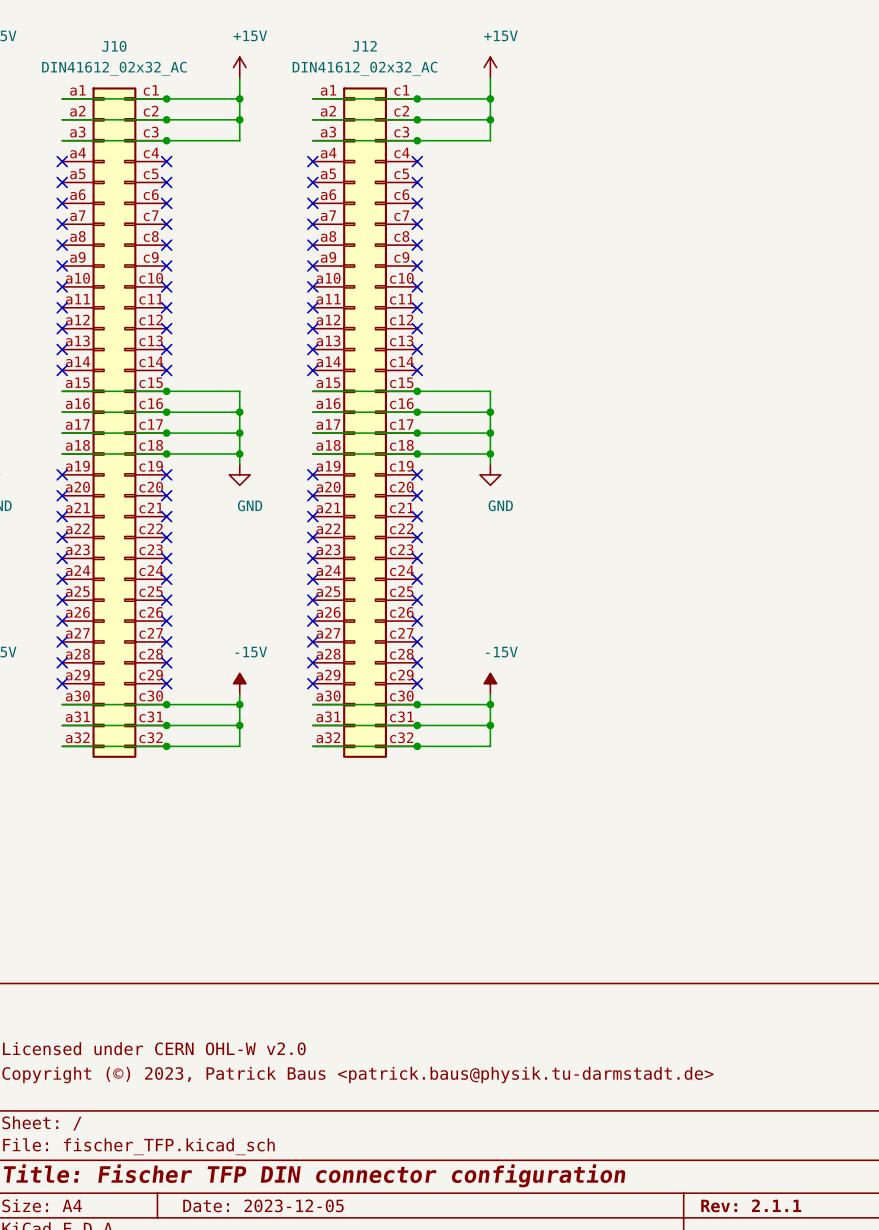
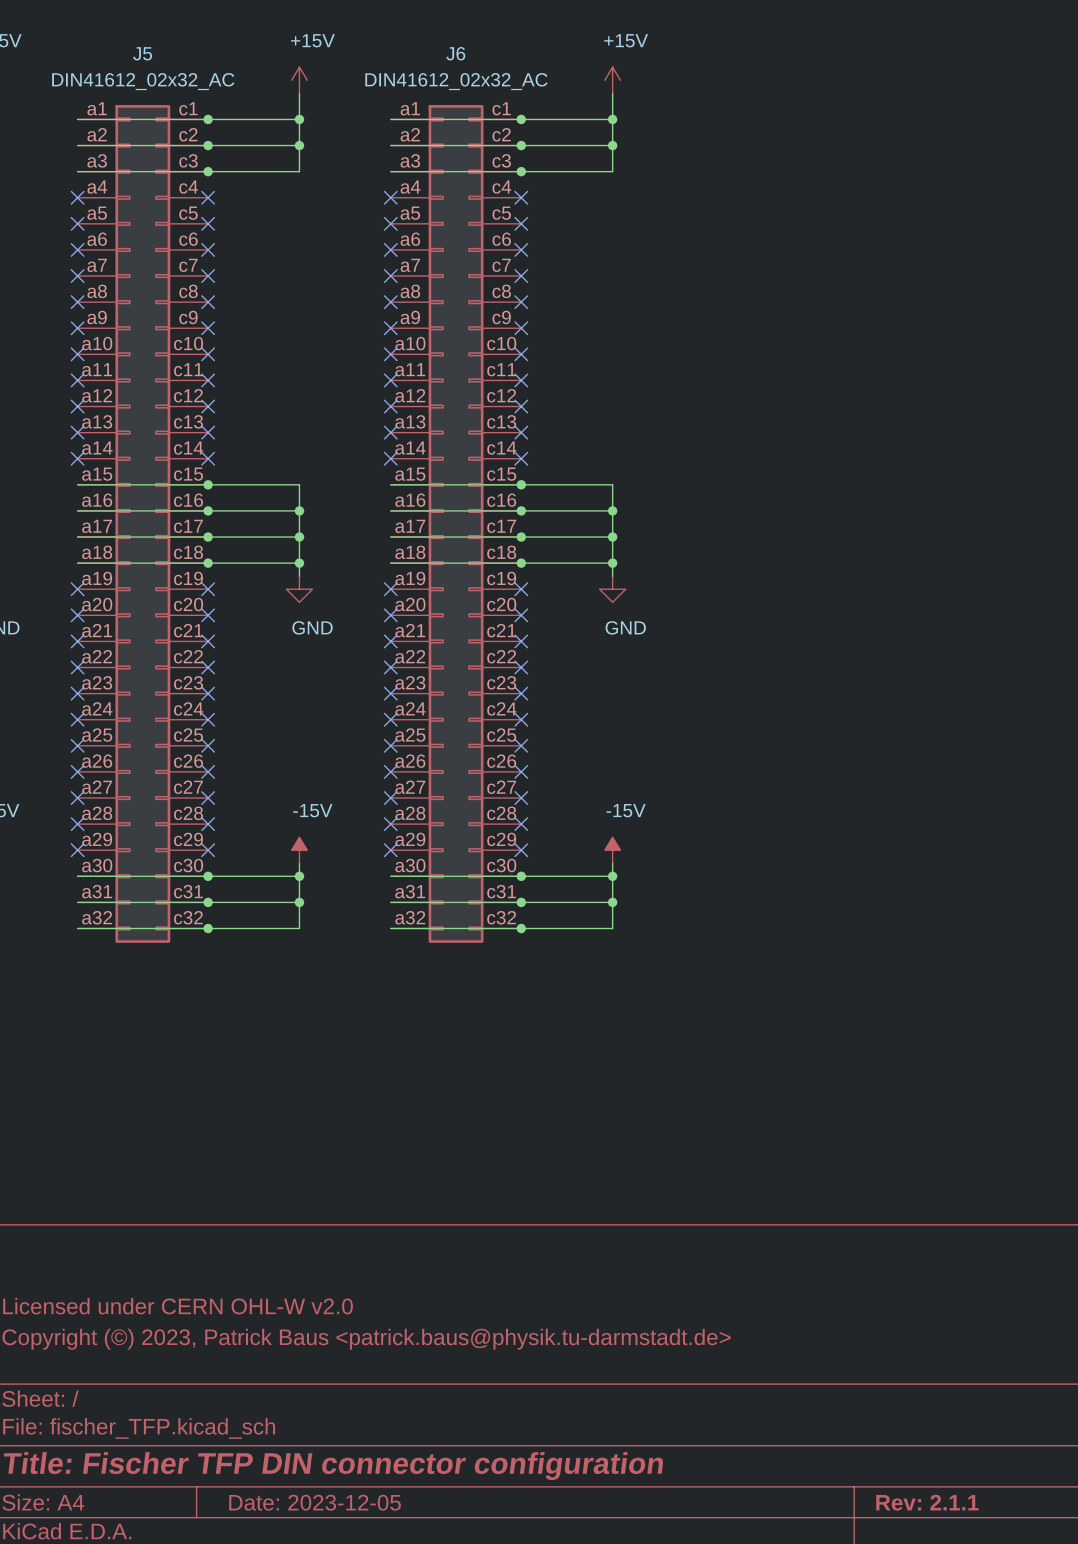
J10 name: J10 (114, 46) -> J5 (142, 53)
J12 name: J12 (364, 46) -> J6 (455, 53)

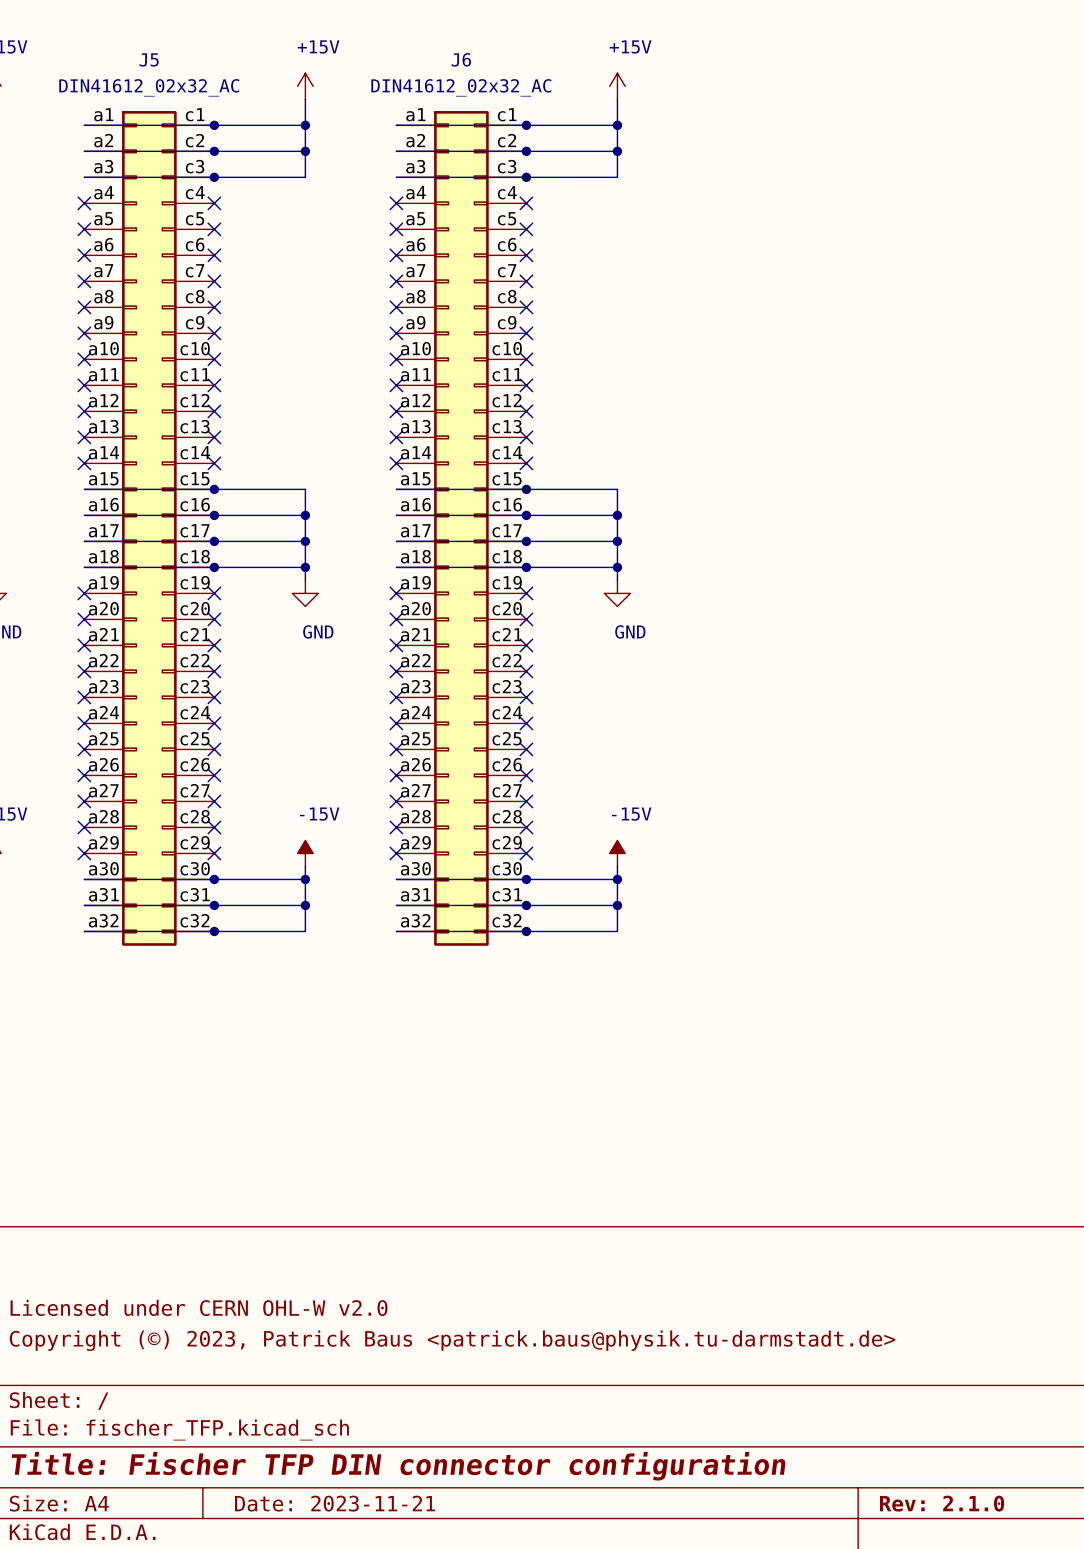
title block: Date: 2023-12-05 (315, 1502) -> Date: 2023-11-21 (335, 1503)
title block: Rev: 2.1.1 (927, 1502) -> Rev: 2.1.0 (942, 1503)

